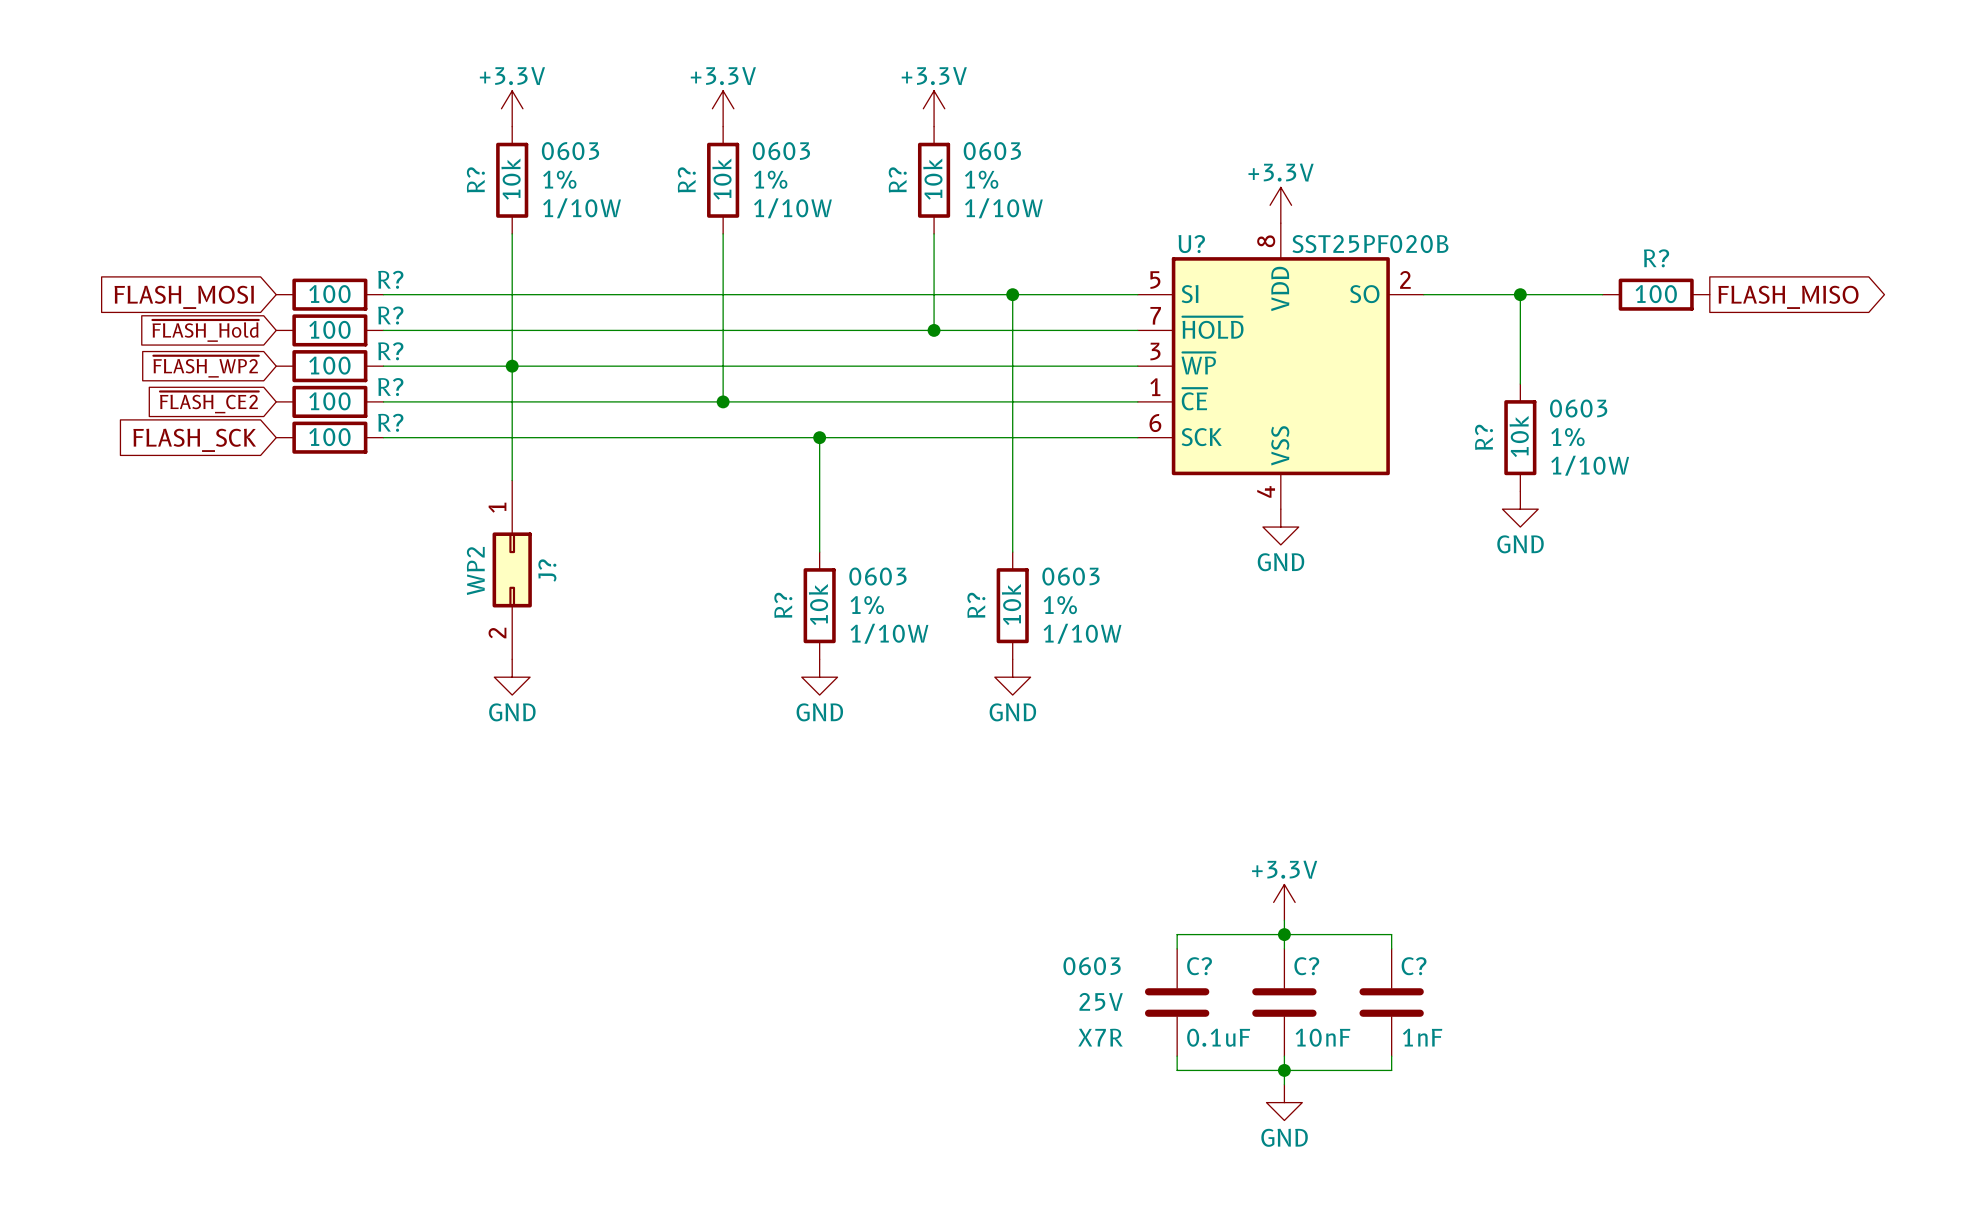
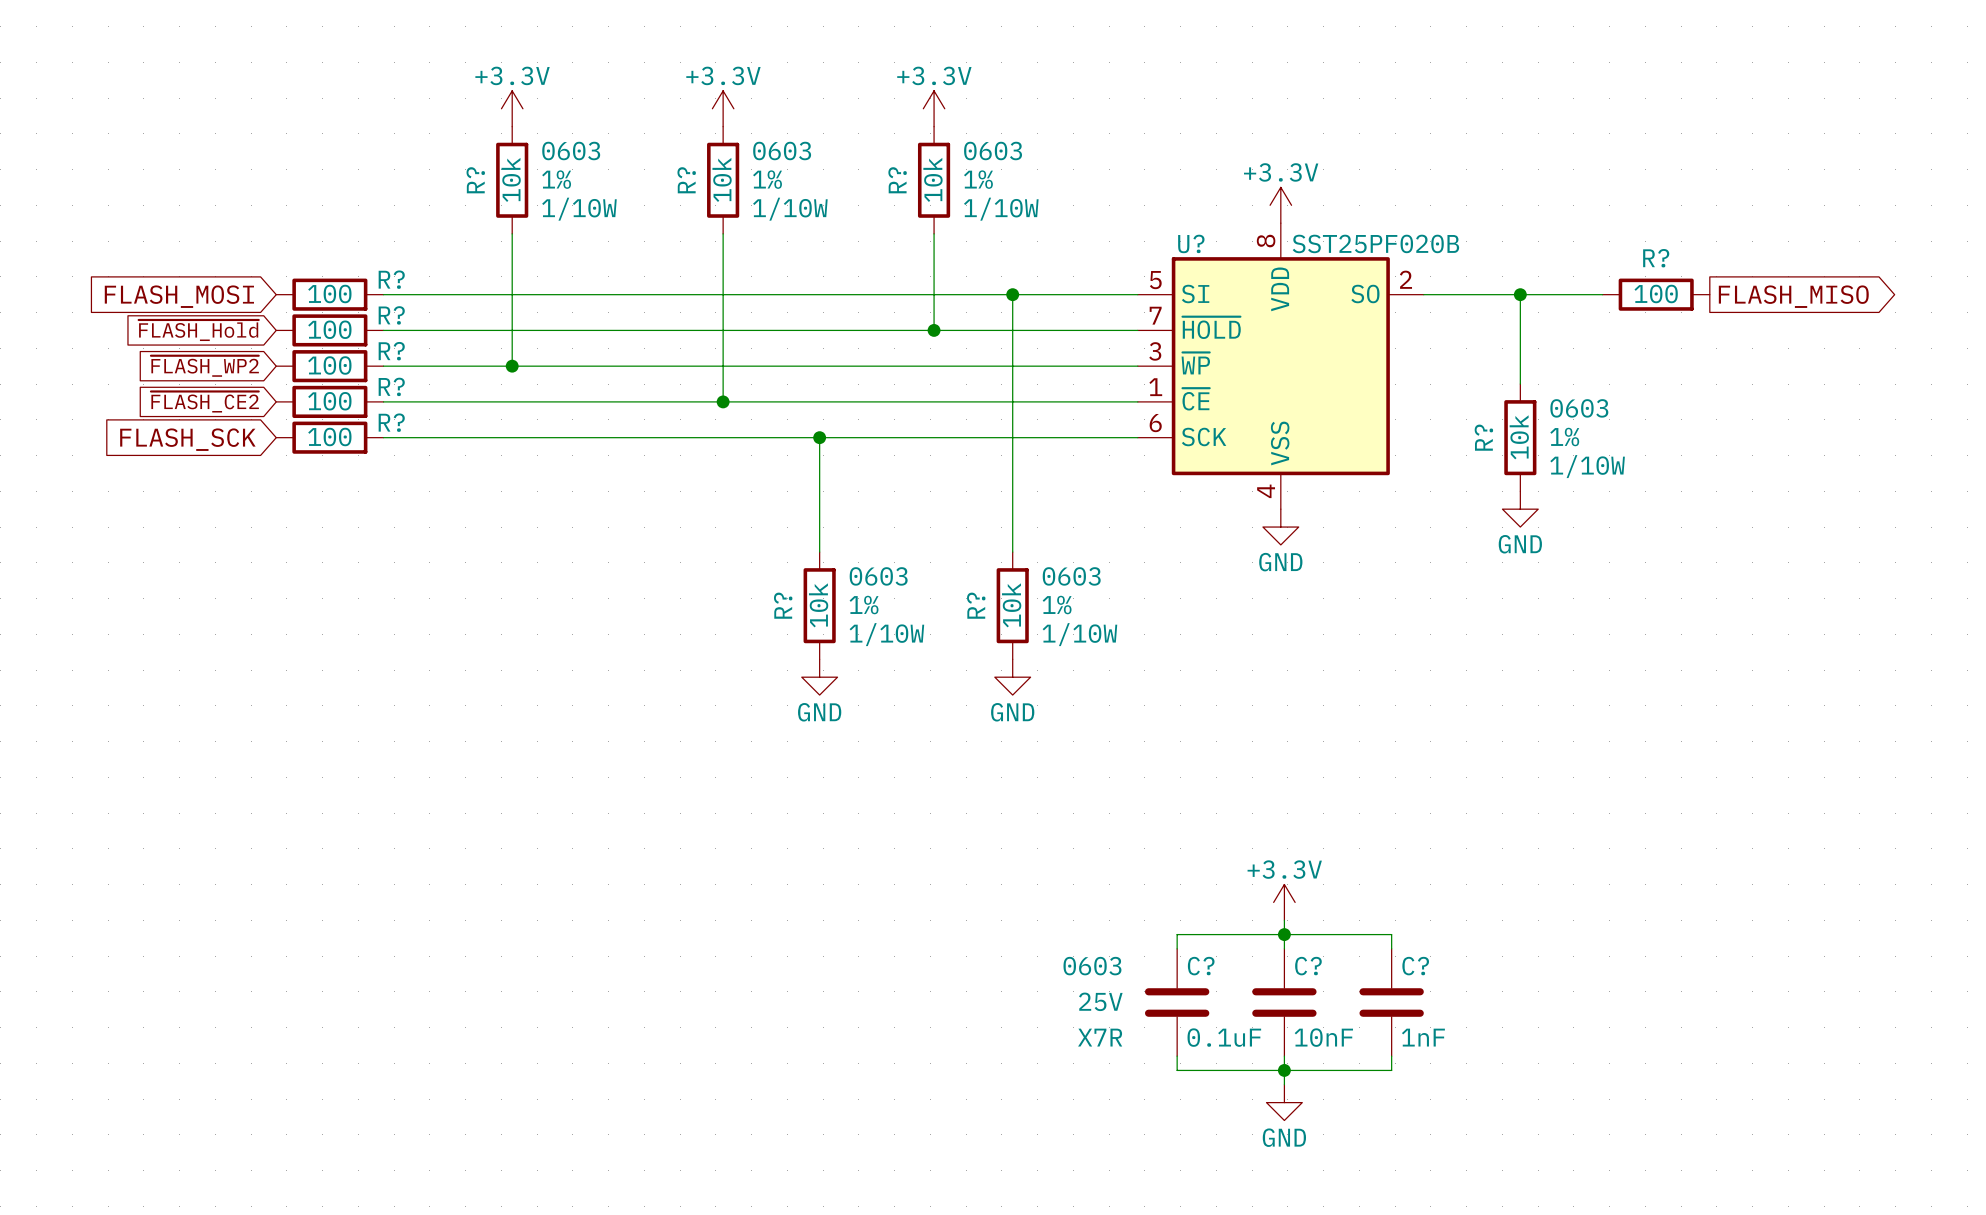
wire: (512, 366) (512, 480) -> none
J?: WP2 (512, 569) -> none
power symbol: GND (512, 677) -> none

